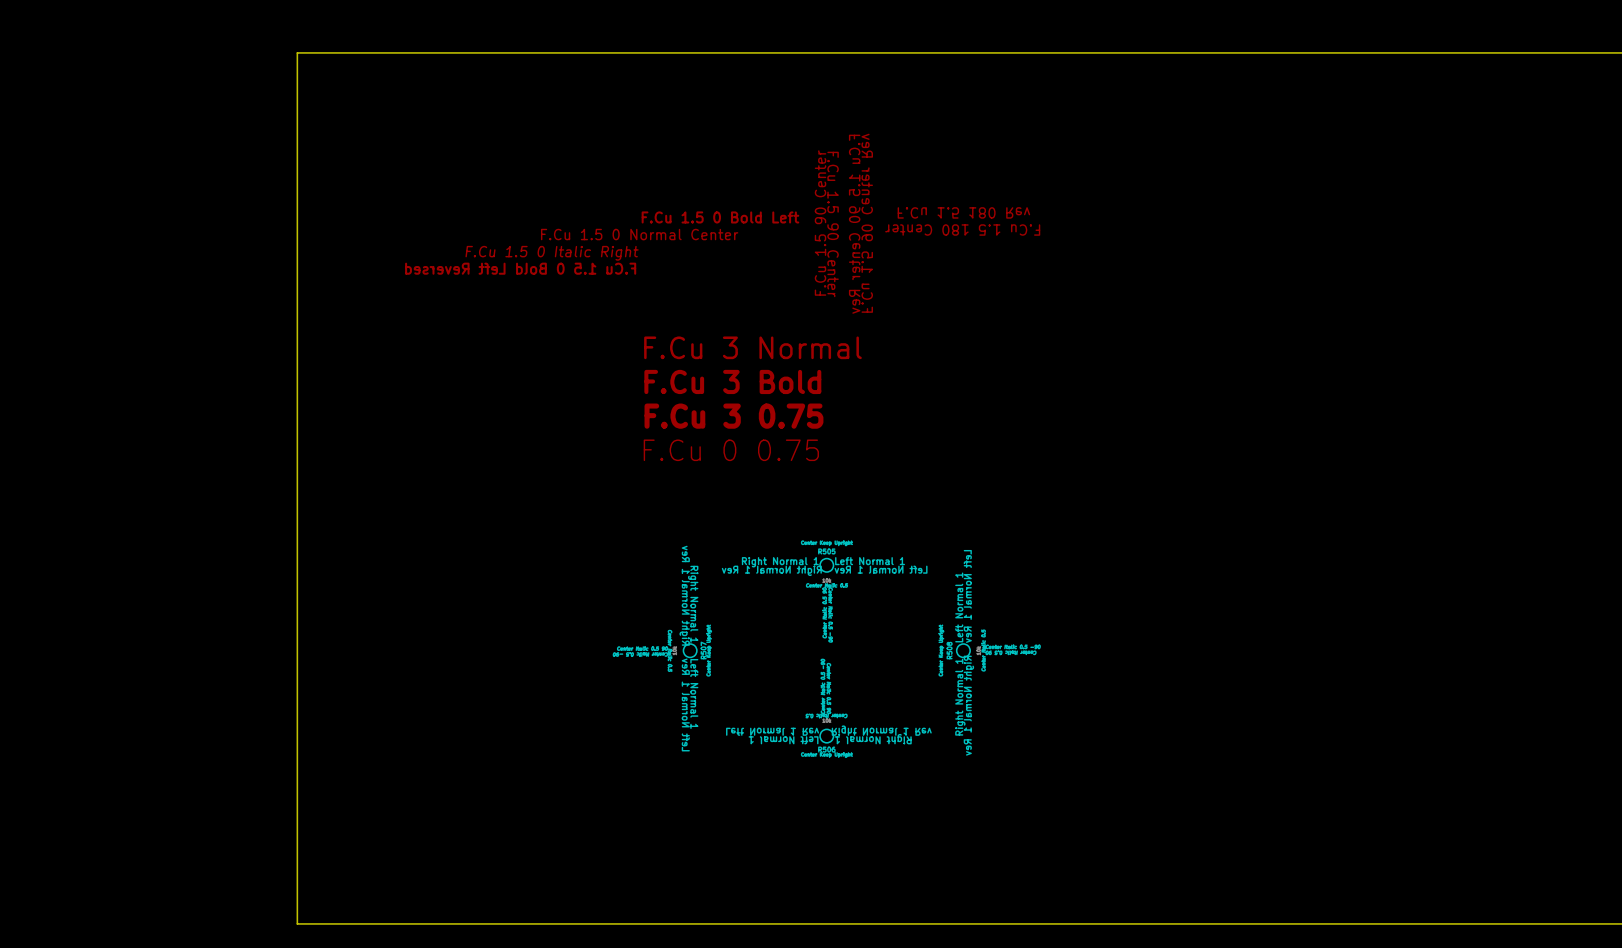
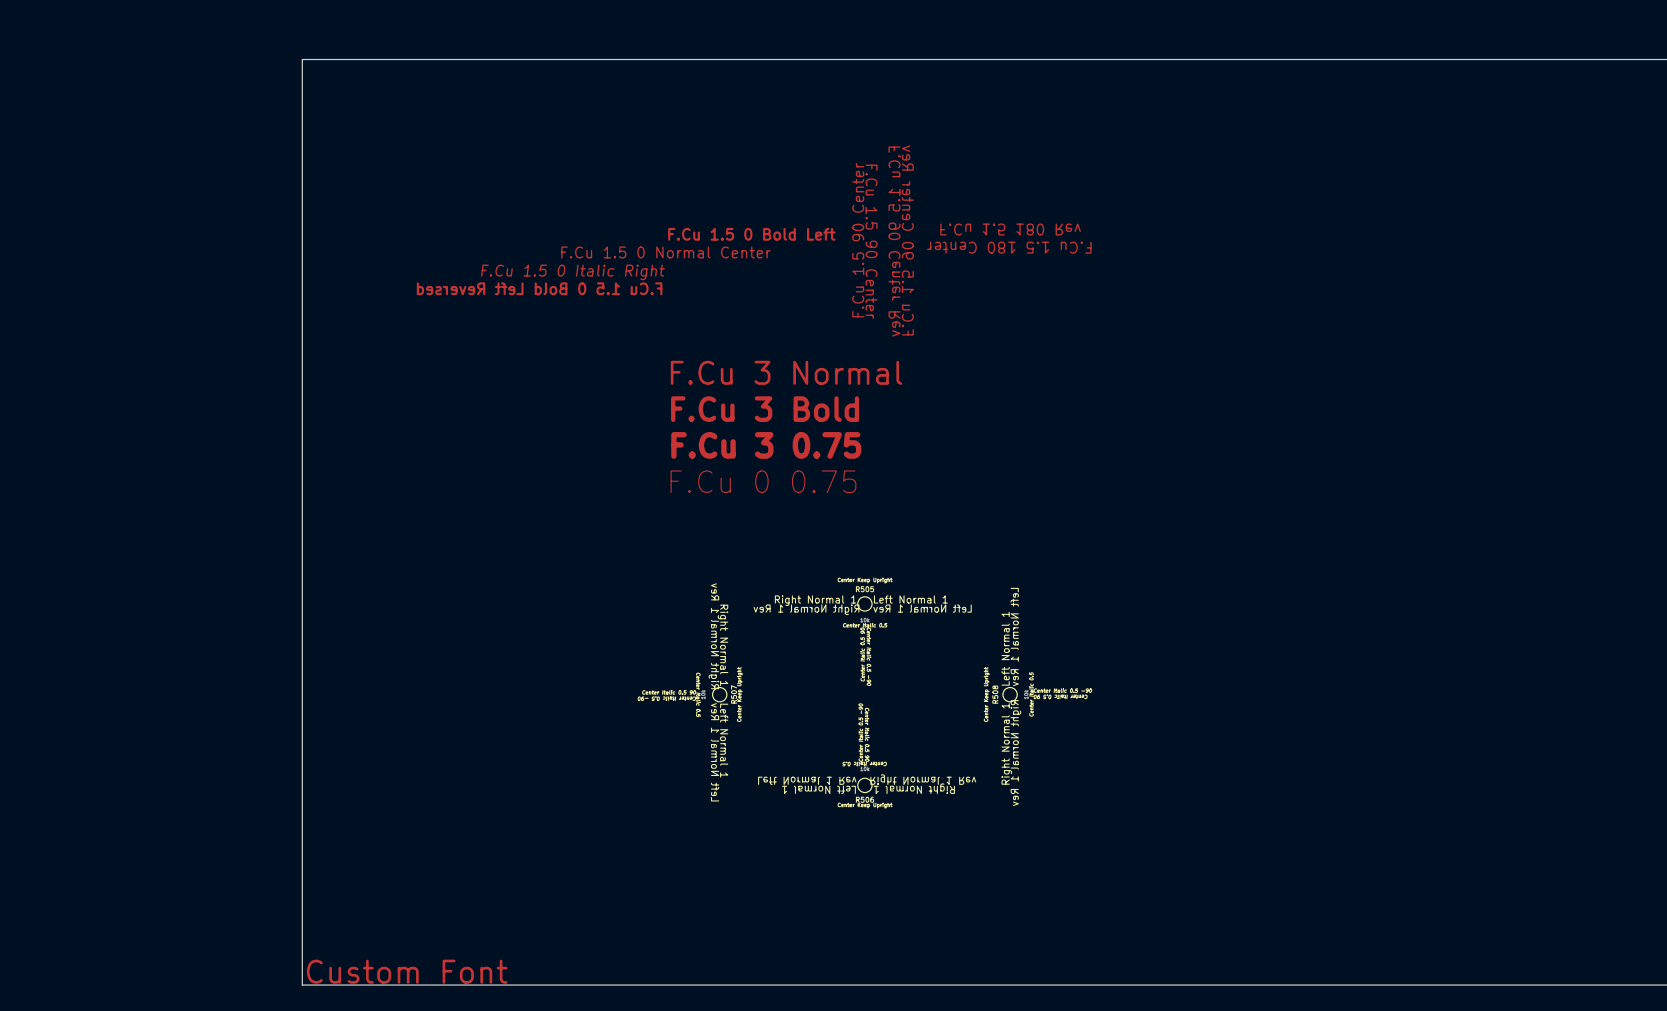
text: none -> Custom Font (407, 971)

